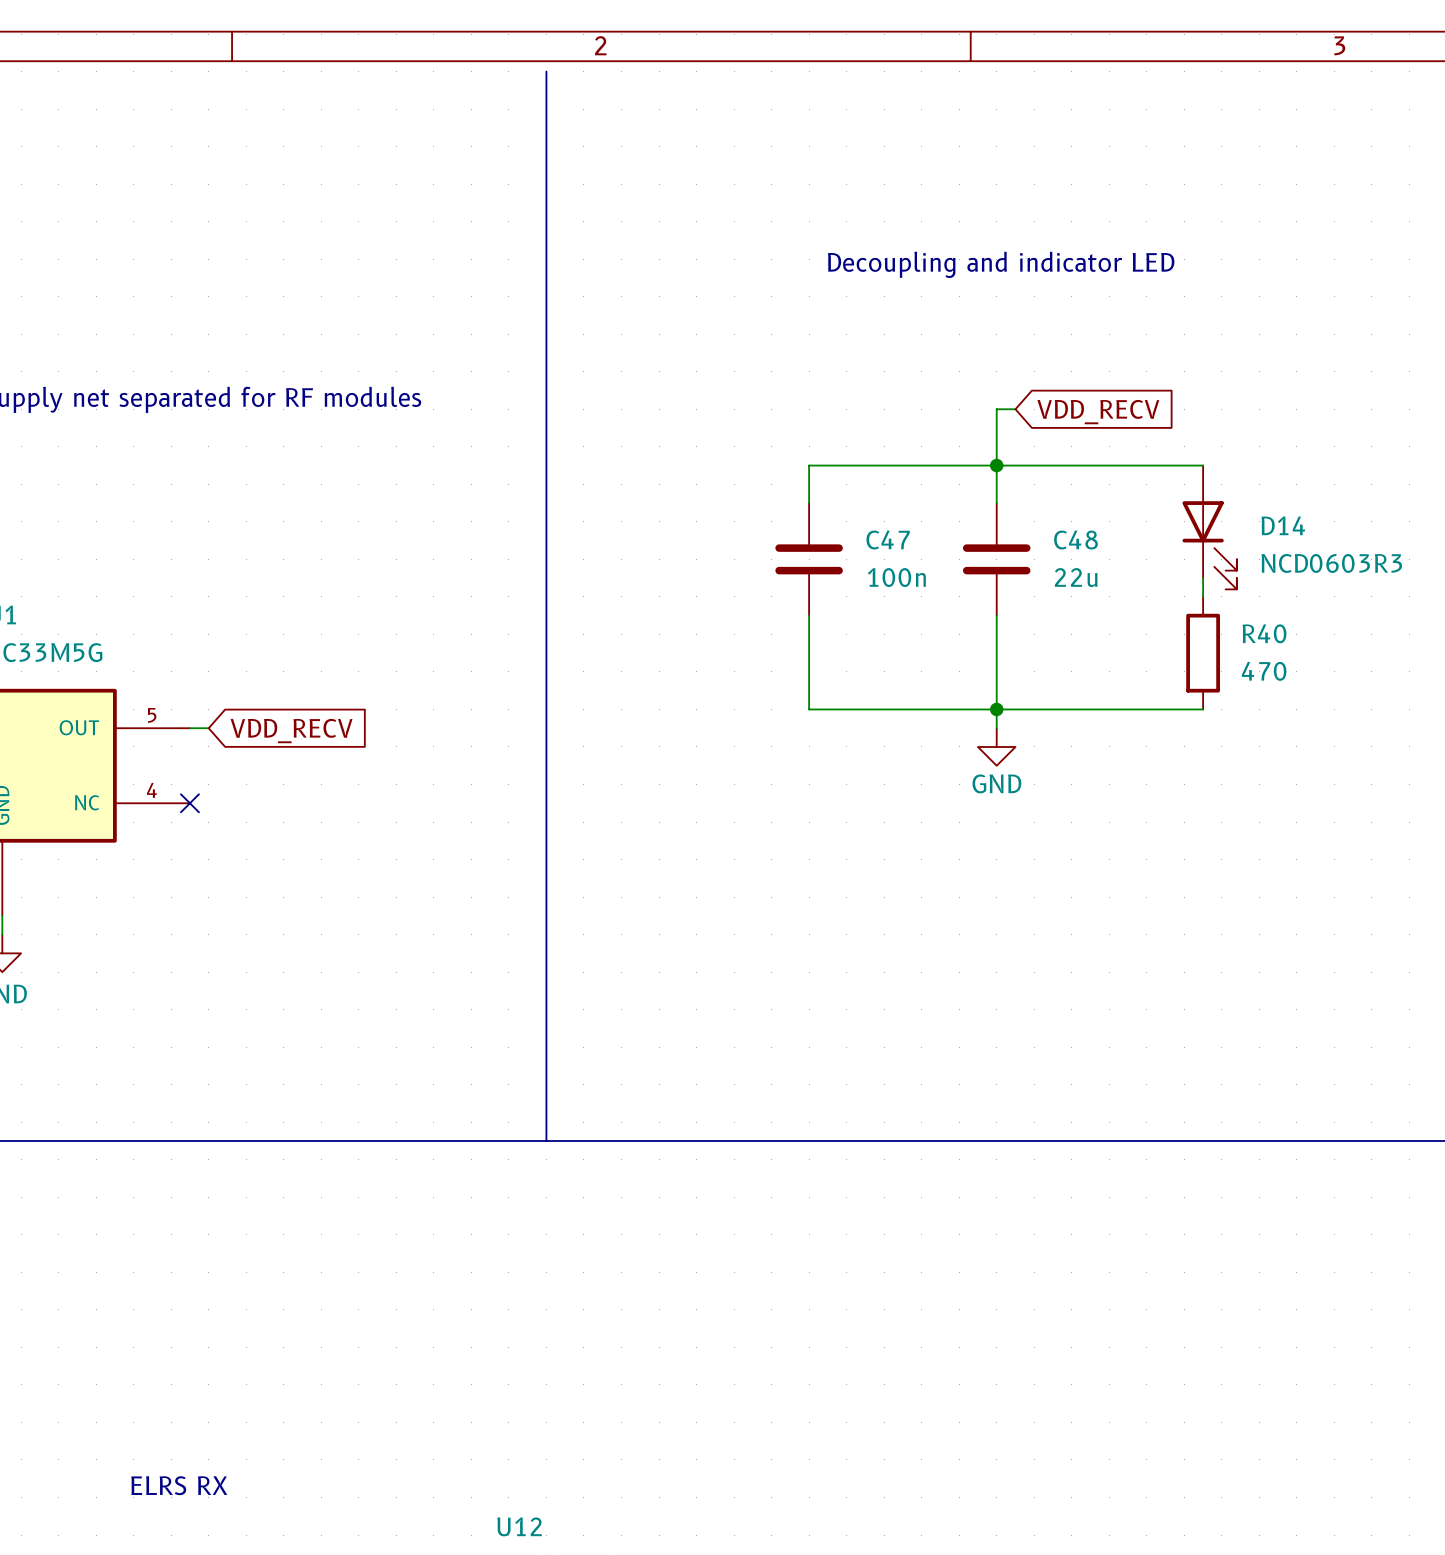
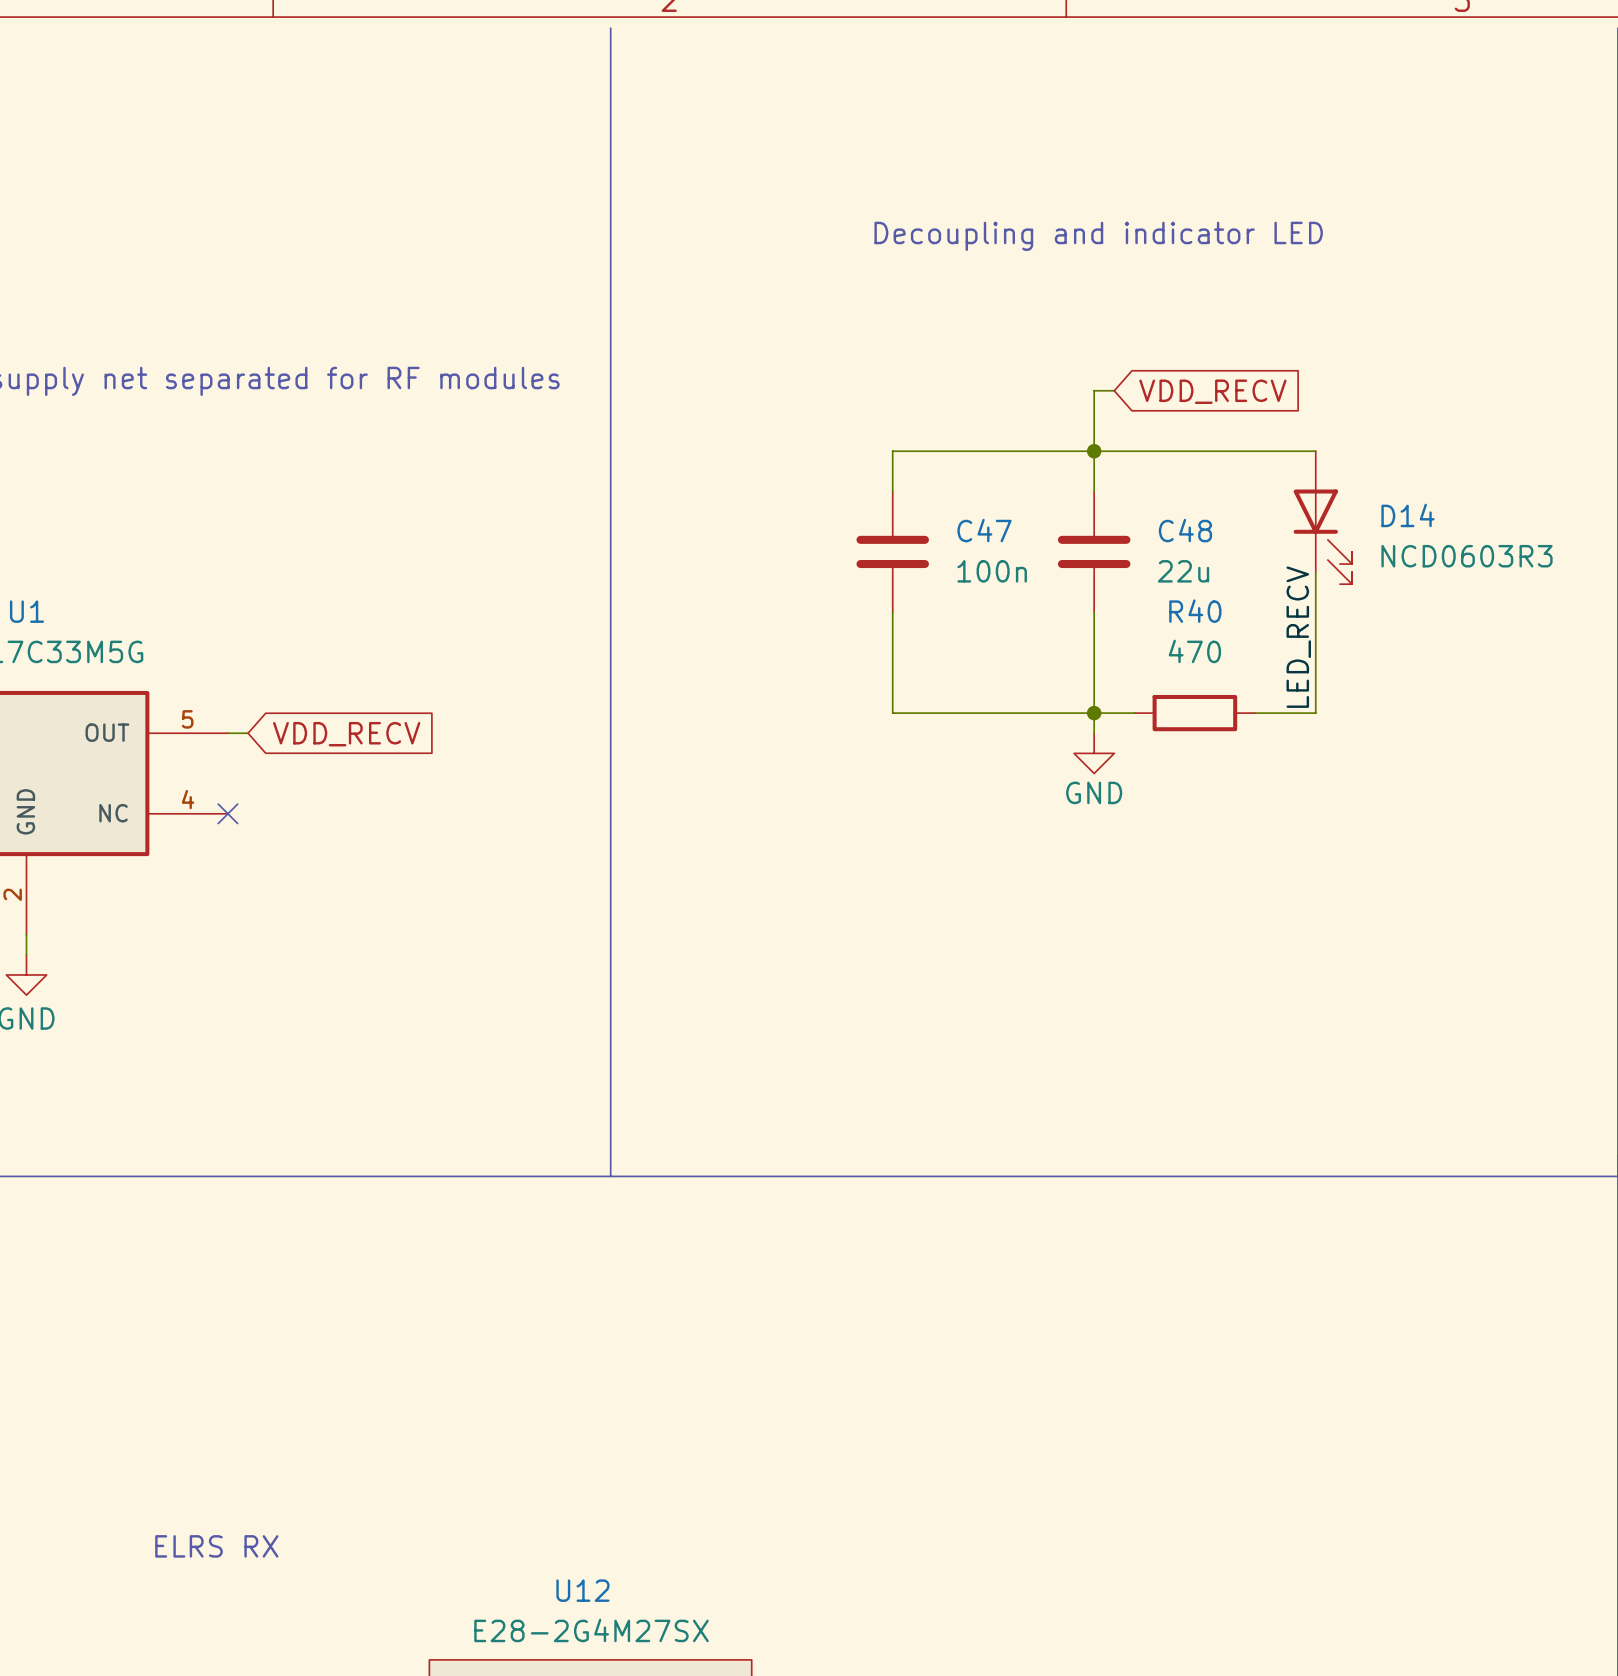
wire: none -> (1315, 592) (1315, 713)
R40 name position: R40 (1264, 633) -> R40 (1195, 611)
label: none -> LED_RECV (1298, 637)
R40 rotation: 0° (1203, 653) -> 90° clockwise (1194, 713)
R40 position: (1203, 653) -> (1194, 713)
R40 value position: 470 (1264, 671) -> 470 (1194, 651)
wire: (1034, 709) (1146, 709) -> none

